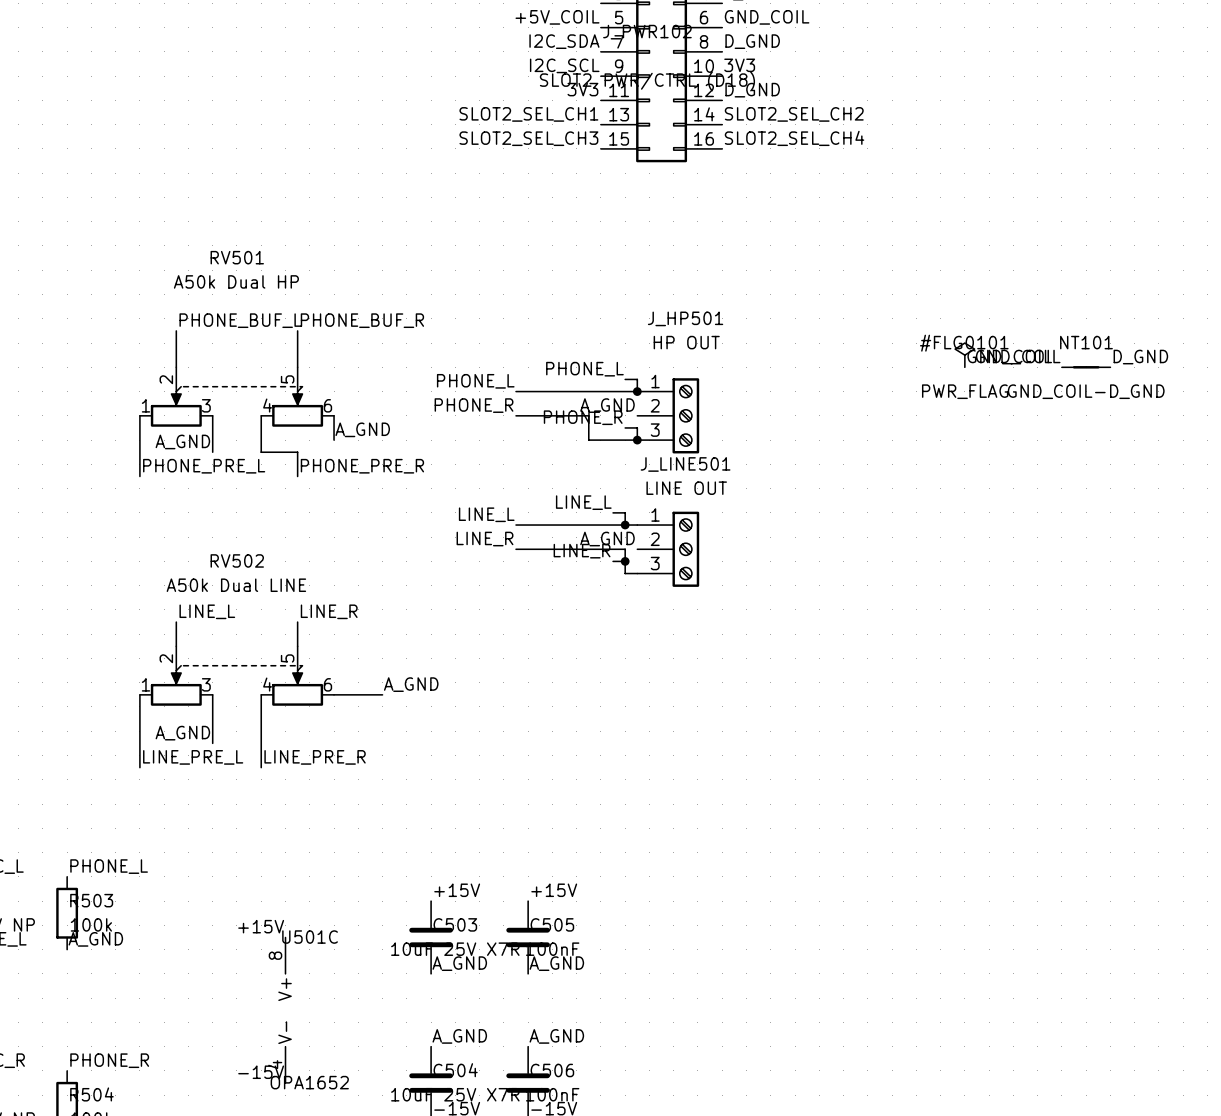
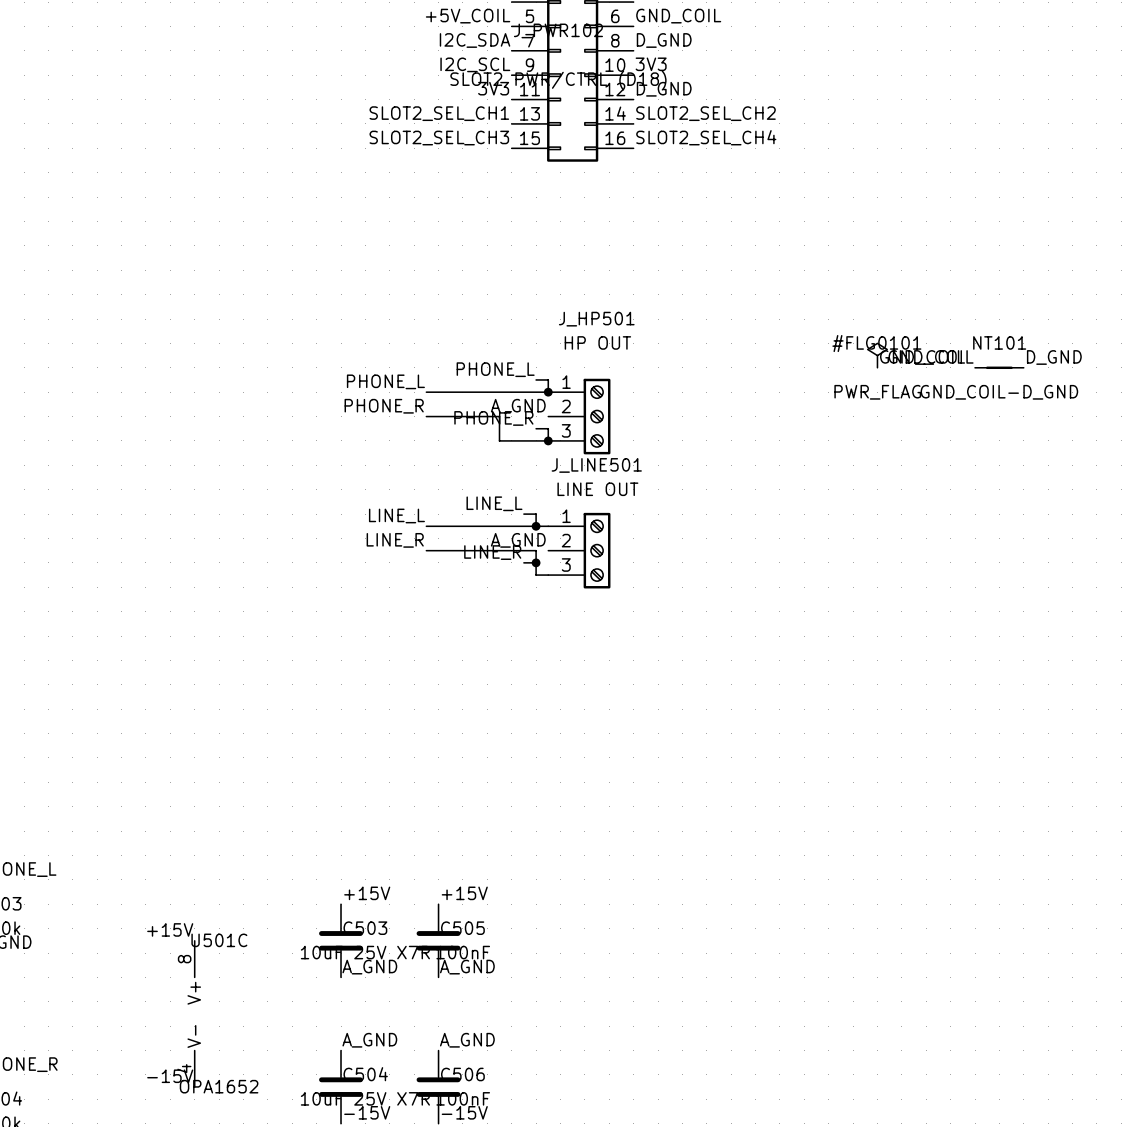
label: PHONE_BUF_L (240, 320) -> none
label: PHONE_BUF_R (362, 320) -> none
wire: (176, 330) (176, 367) -> none
wire: (297, 330) (297, 367) -> none
RV501: A50k Dual HP (236, 397) -> none
wire: (139, 415) (139, 476) -> none
wire: (212, 415) (212, 452) -> none
wire: (261, 415) (261, 452) (297, 452) (297, 476) -> none
wire: (334, 415) (334, 440) -> none
label: A_GND (362, 429) -> none
label: A_GND (182, 441) -> none
label: PHONE_PRE_L (204, 466) -> none
label: PHONE_PRE_R (362, 466) -> none
label: LINE_L (207, 611) -> none
label: LINE_R (329, 611) -> none
wire: (176, 622) (176, 646) -> none
wire: (297, 622) (297, 646) -> none
RV502: A50k Dual LINE (236, 676) -> none
label: A_GND (411, 684) -> none
wire: (139, 694) (139, 767) -> none
wire: (212, 694) (212, 743) -> none
wire: (261, 694) (261, 767) -> none
wire: (334, 694) (382, 694) -> none
label: A_GND (182, 733) -> none
label: LINE_PRE_L (193, 757) -> none
label: LINE_PRE_R (315, 757) -> none

